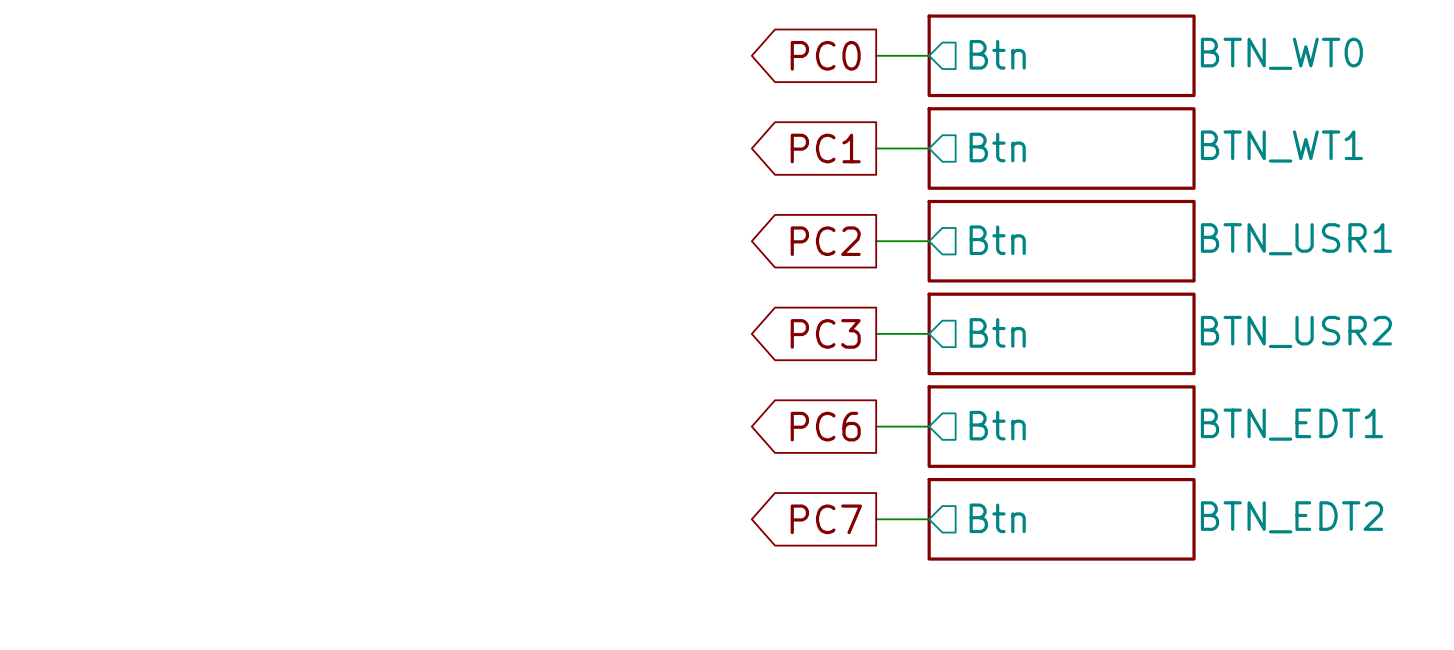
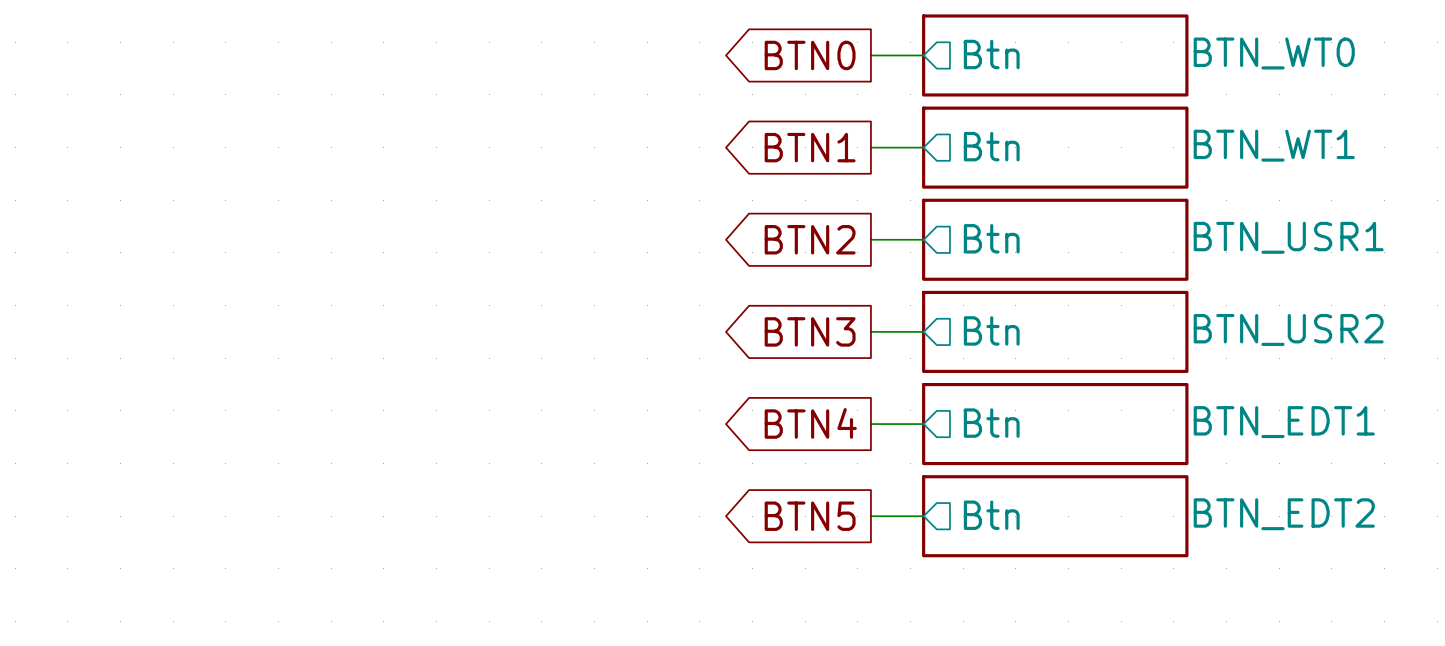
global label: PC0 (825, 55) -> BTN0 (810, 55)
global label: PC1 (825, 148) -> BTN1 (810, 147)
global label: PC2 (825, 241) -> BTN2 (810, 239)
global label: PC3 (825, 333) -> BTN3 (810, 331)
global label: PC6 (825, 426) -> BTN4 (810, 423)
global label: PC7 (826, 519) -> BTN5 (810, 516)

